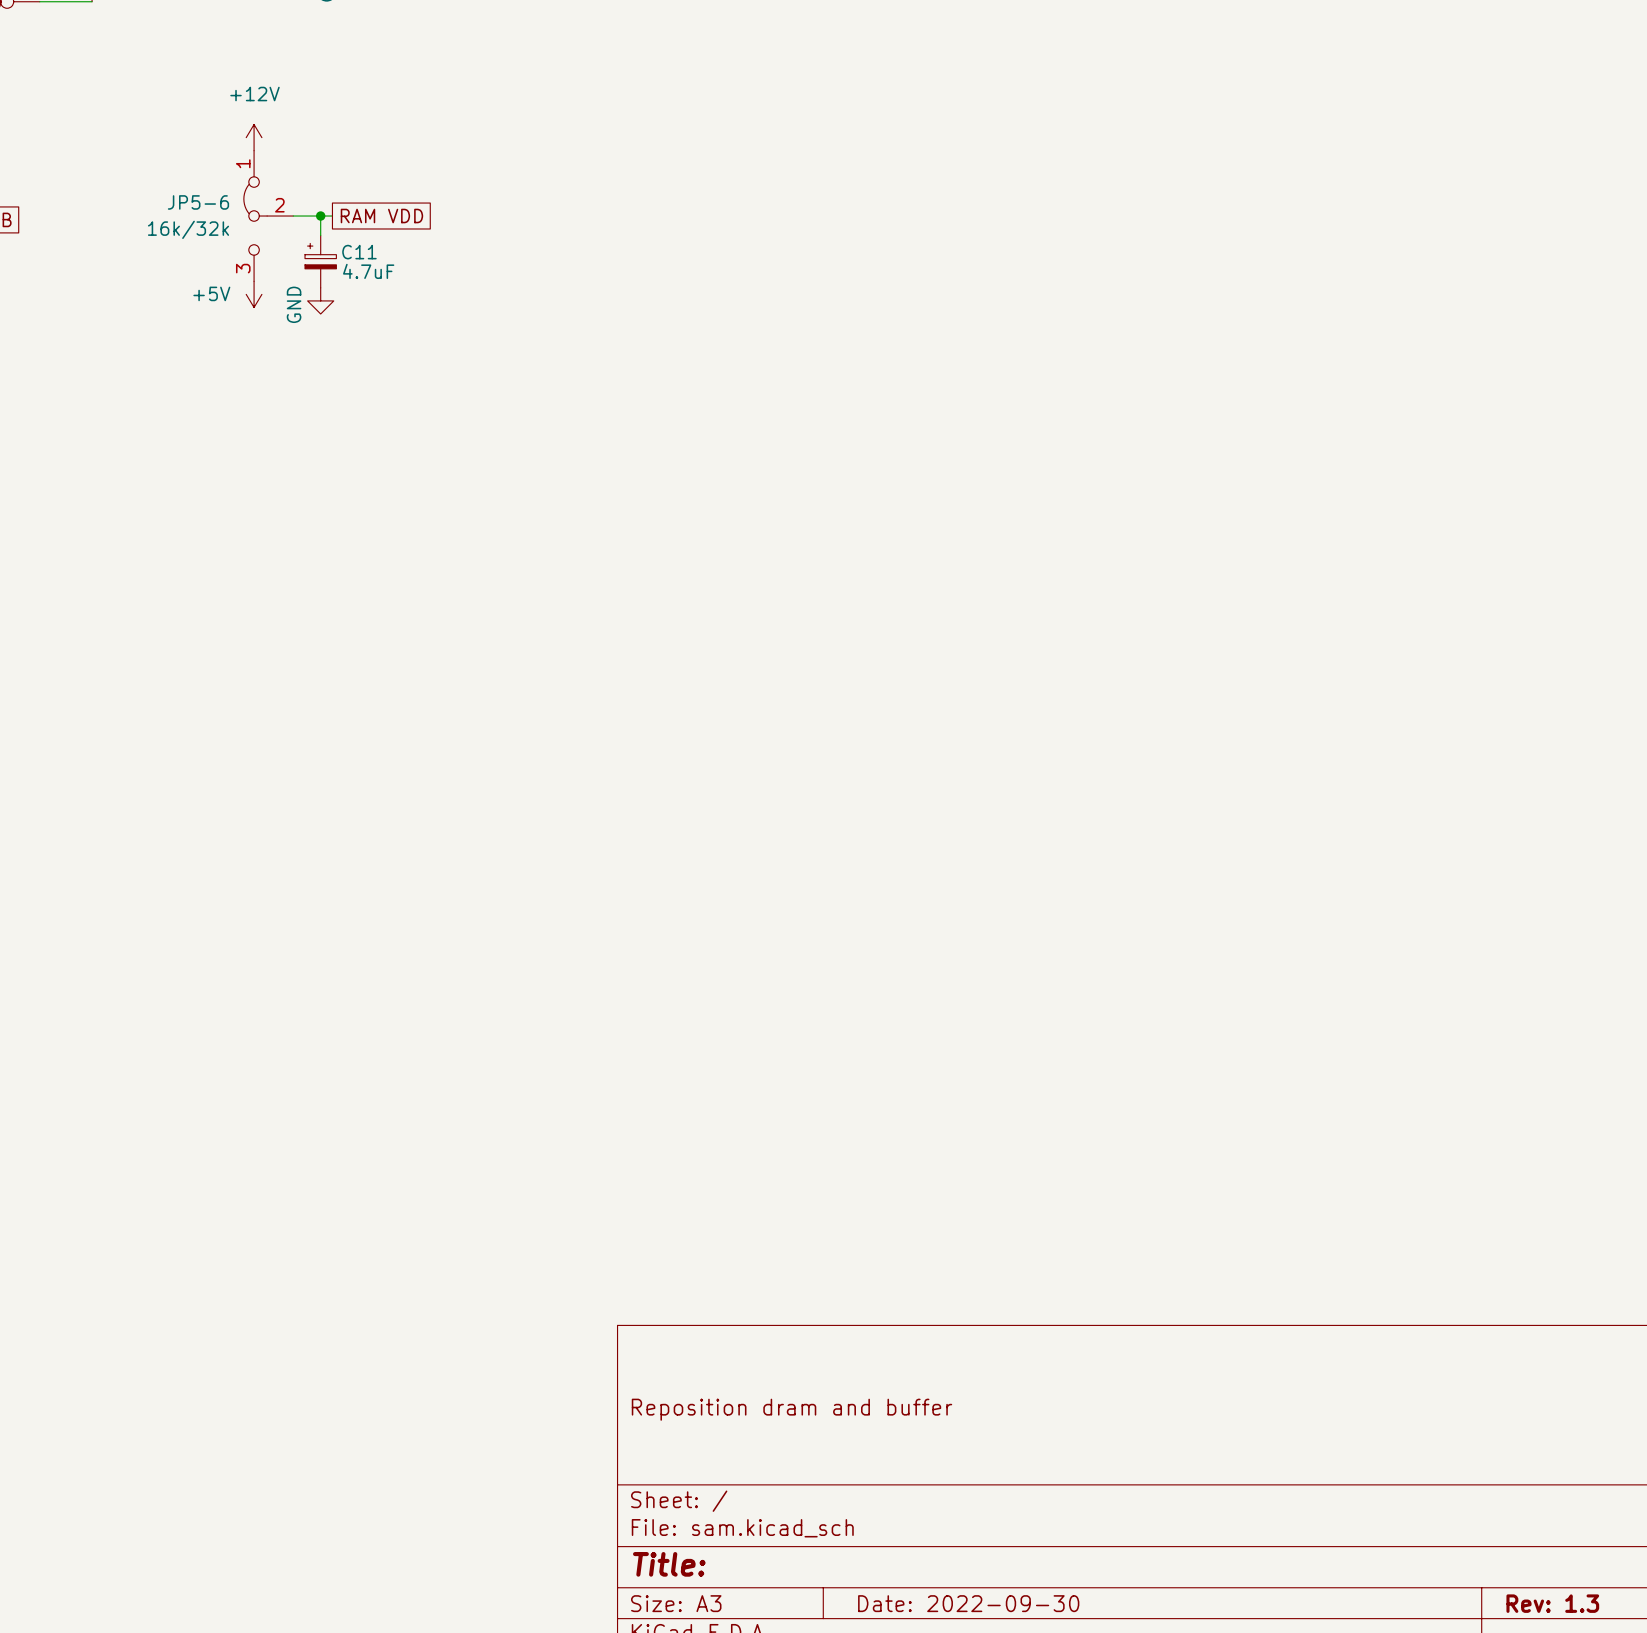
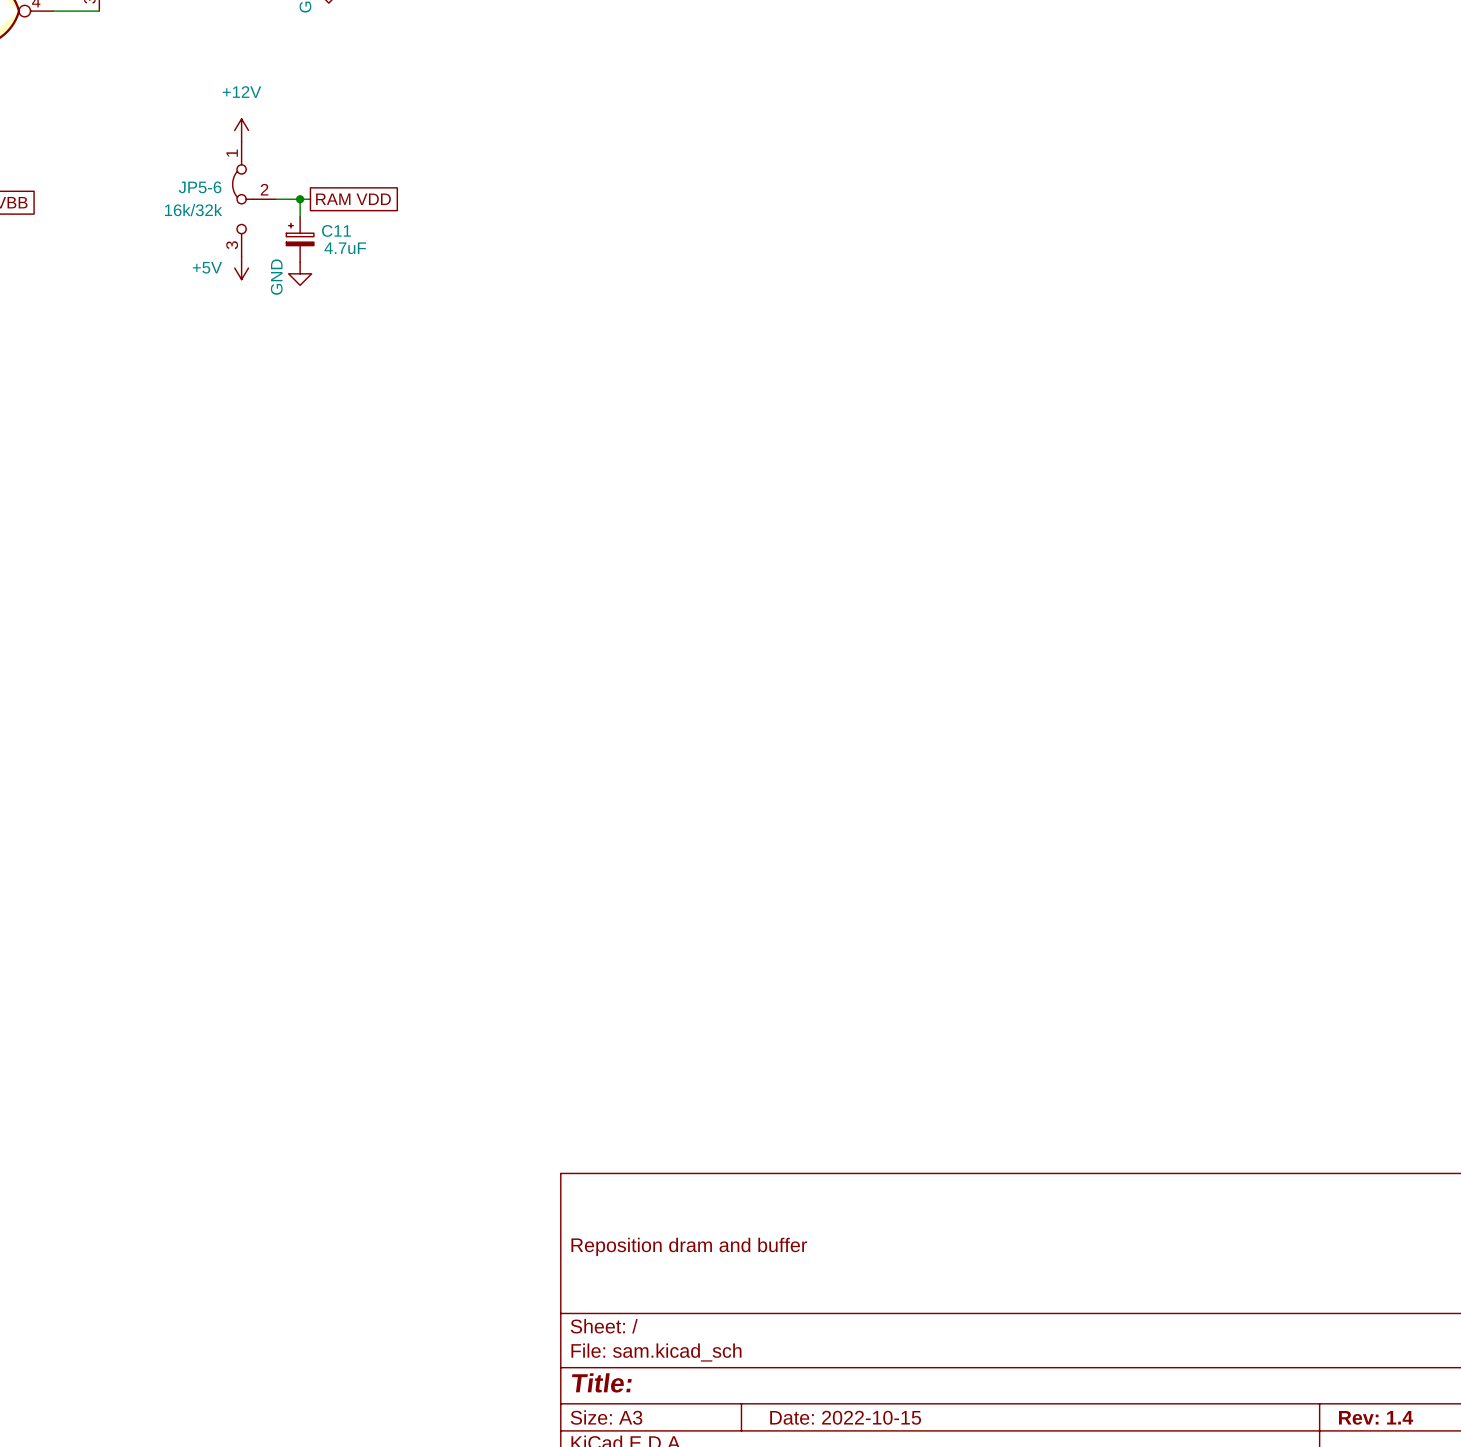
title block: Date: 2022-09-30 (968, 1603) -> Date: 2022-10-15 (845, 1417)
title block: Rev: 1.3 (1552, 1603) -> Rev: 1.4 (1376, 1417)

